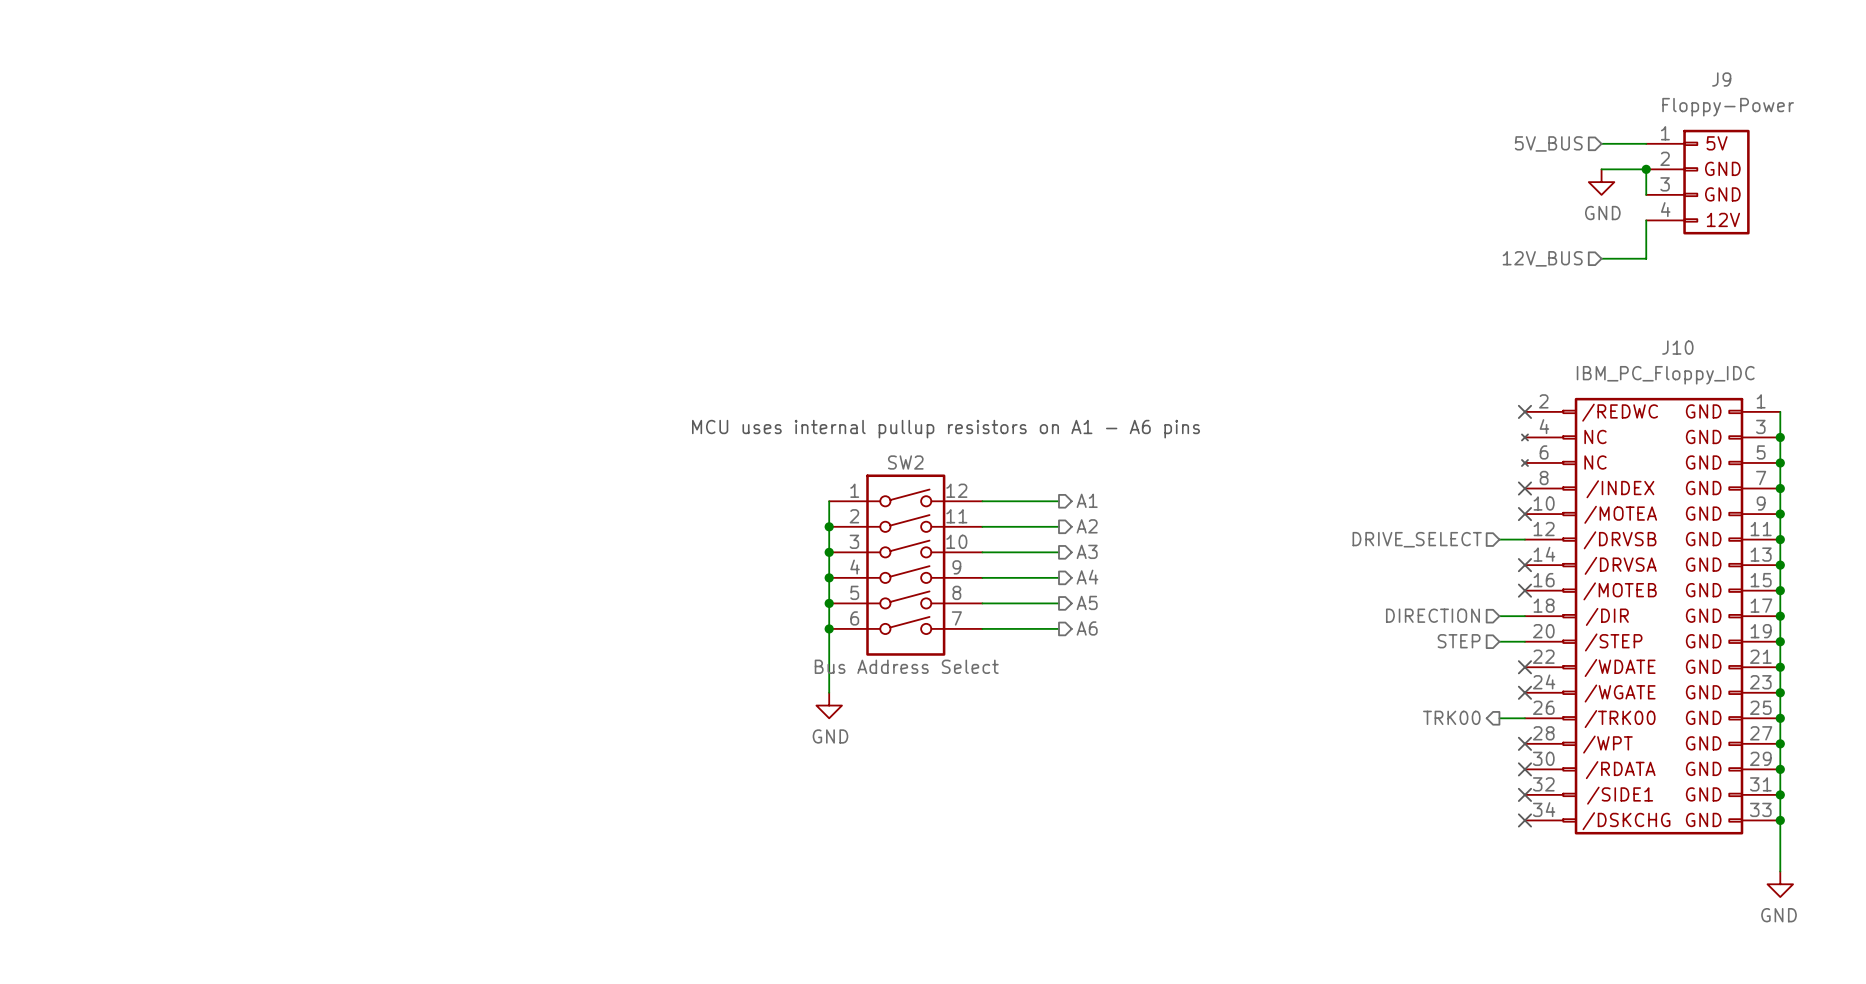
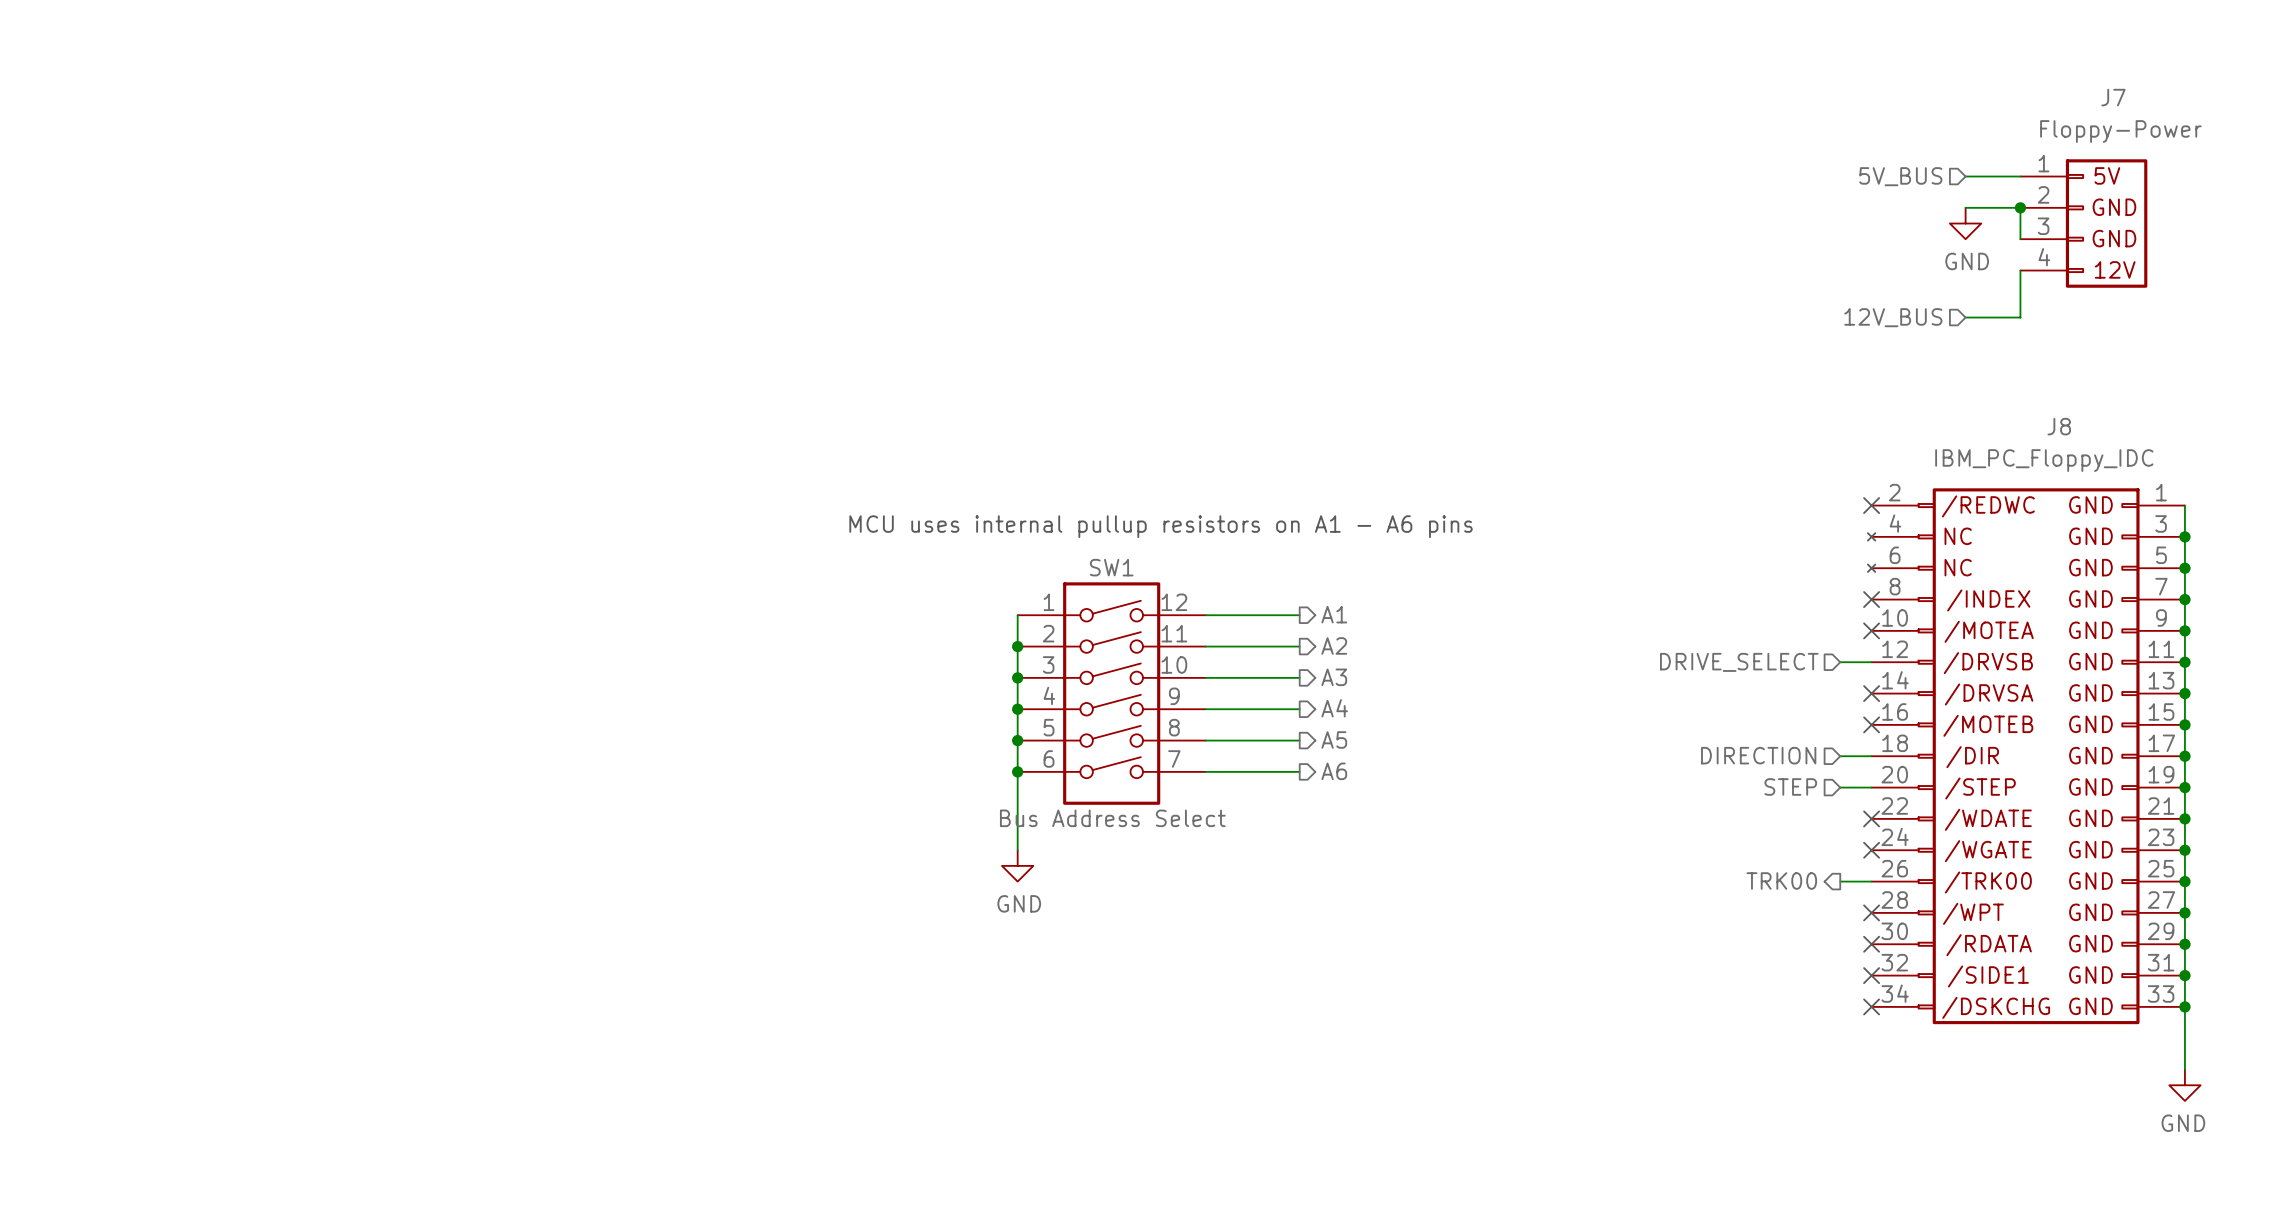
J9 name: J9 (1721, 79) -> J7 (2113, 97)
J10 name: J10 (1677, 347) -> J8 (2059, 426)
SW2 name: SW2 (905, 462) -> SW1 (1111, 567)

